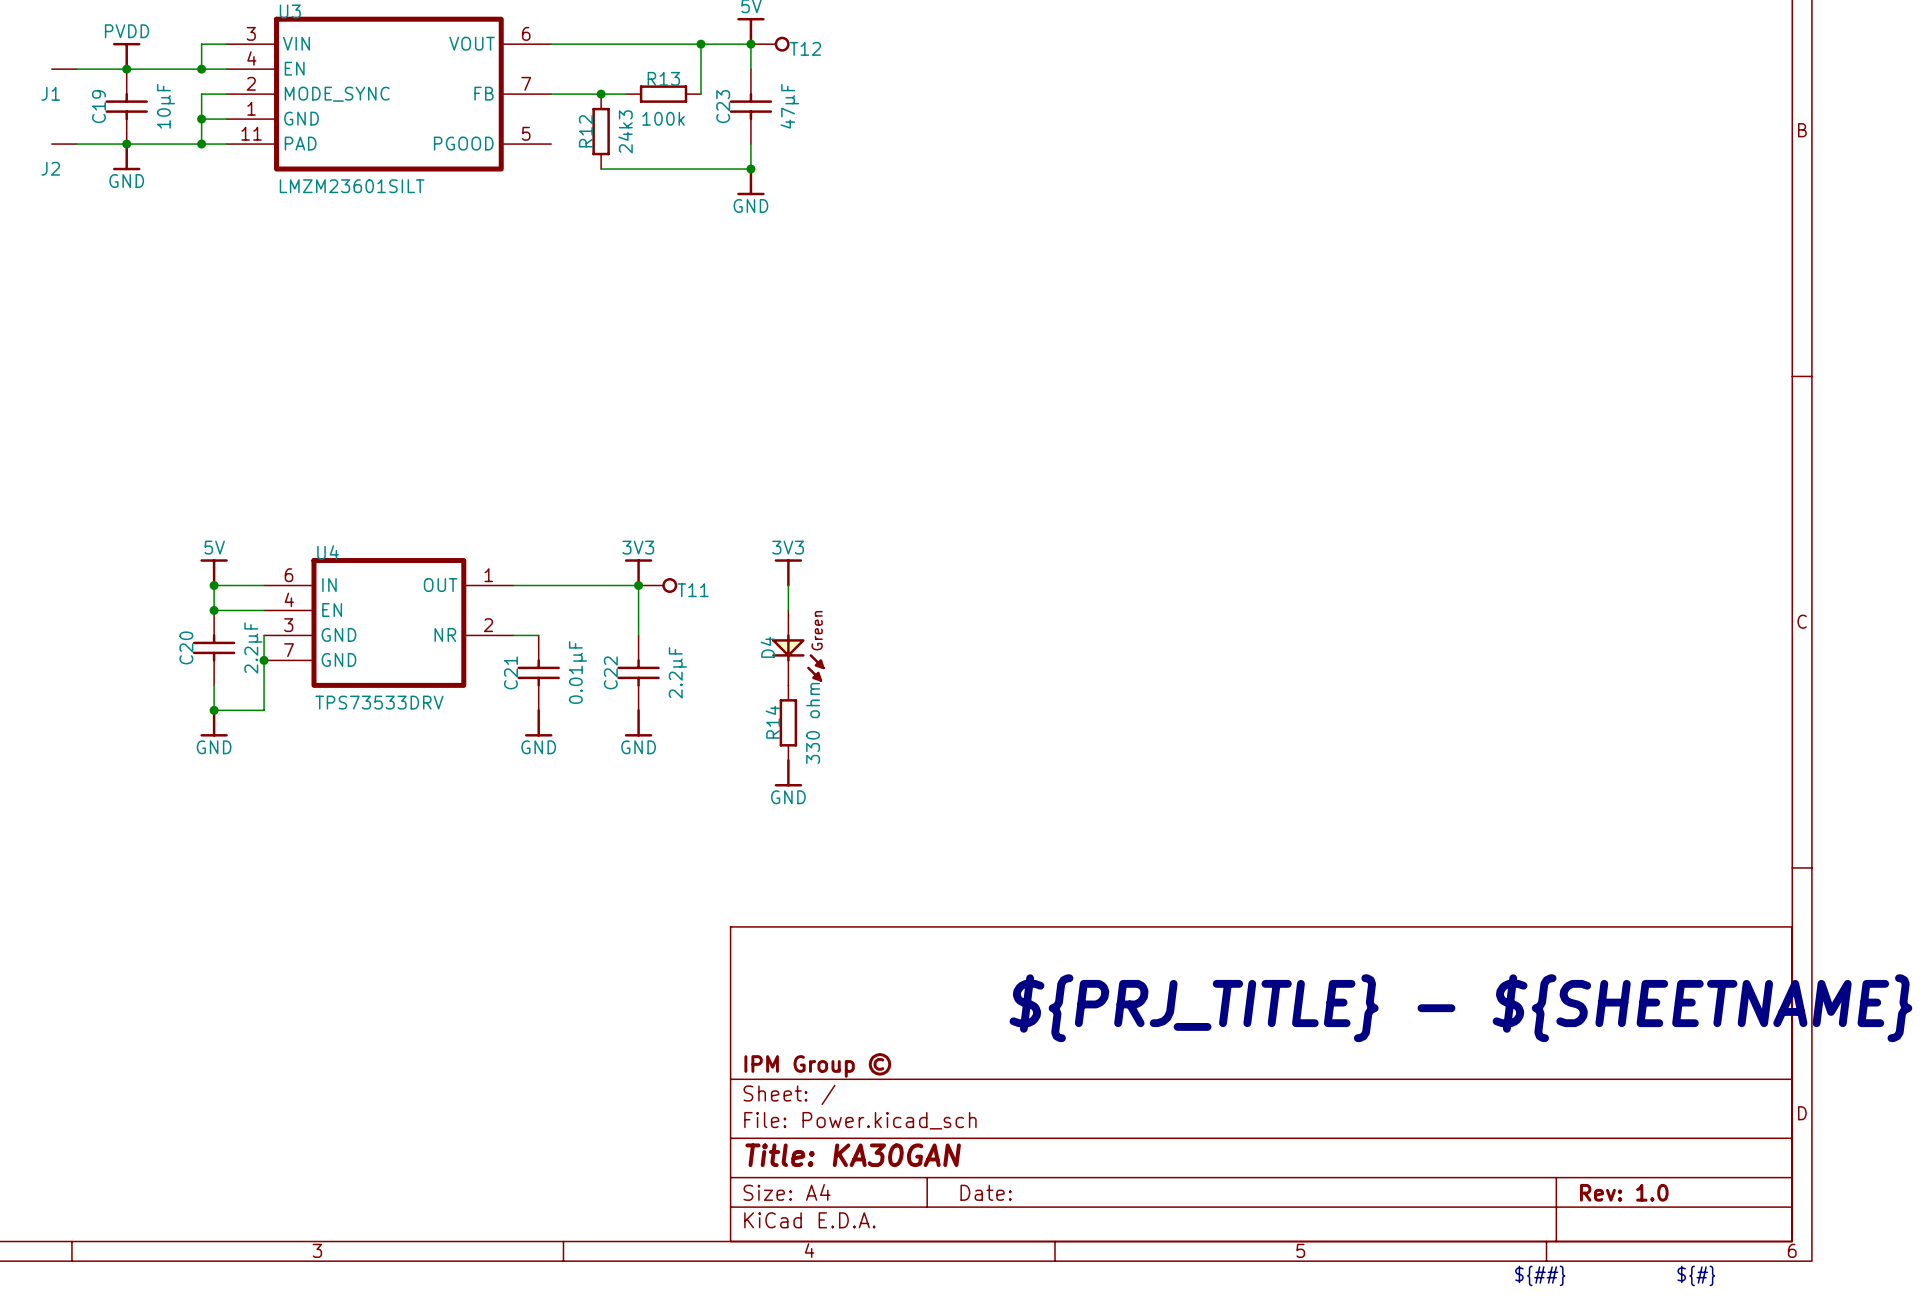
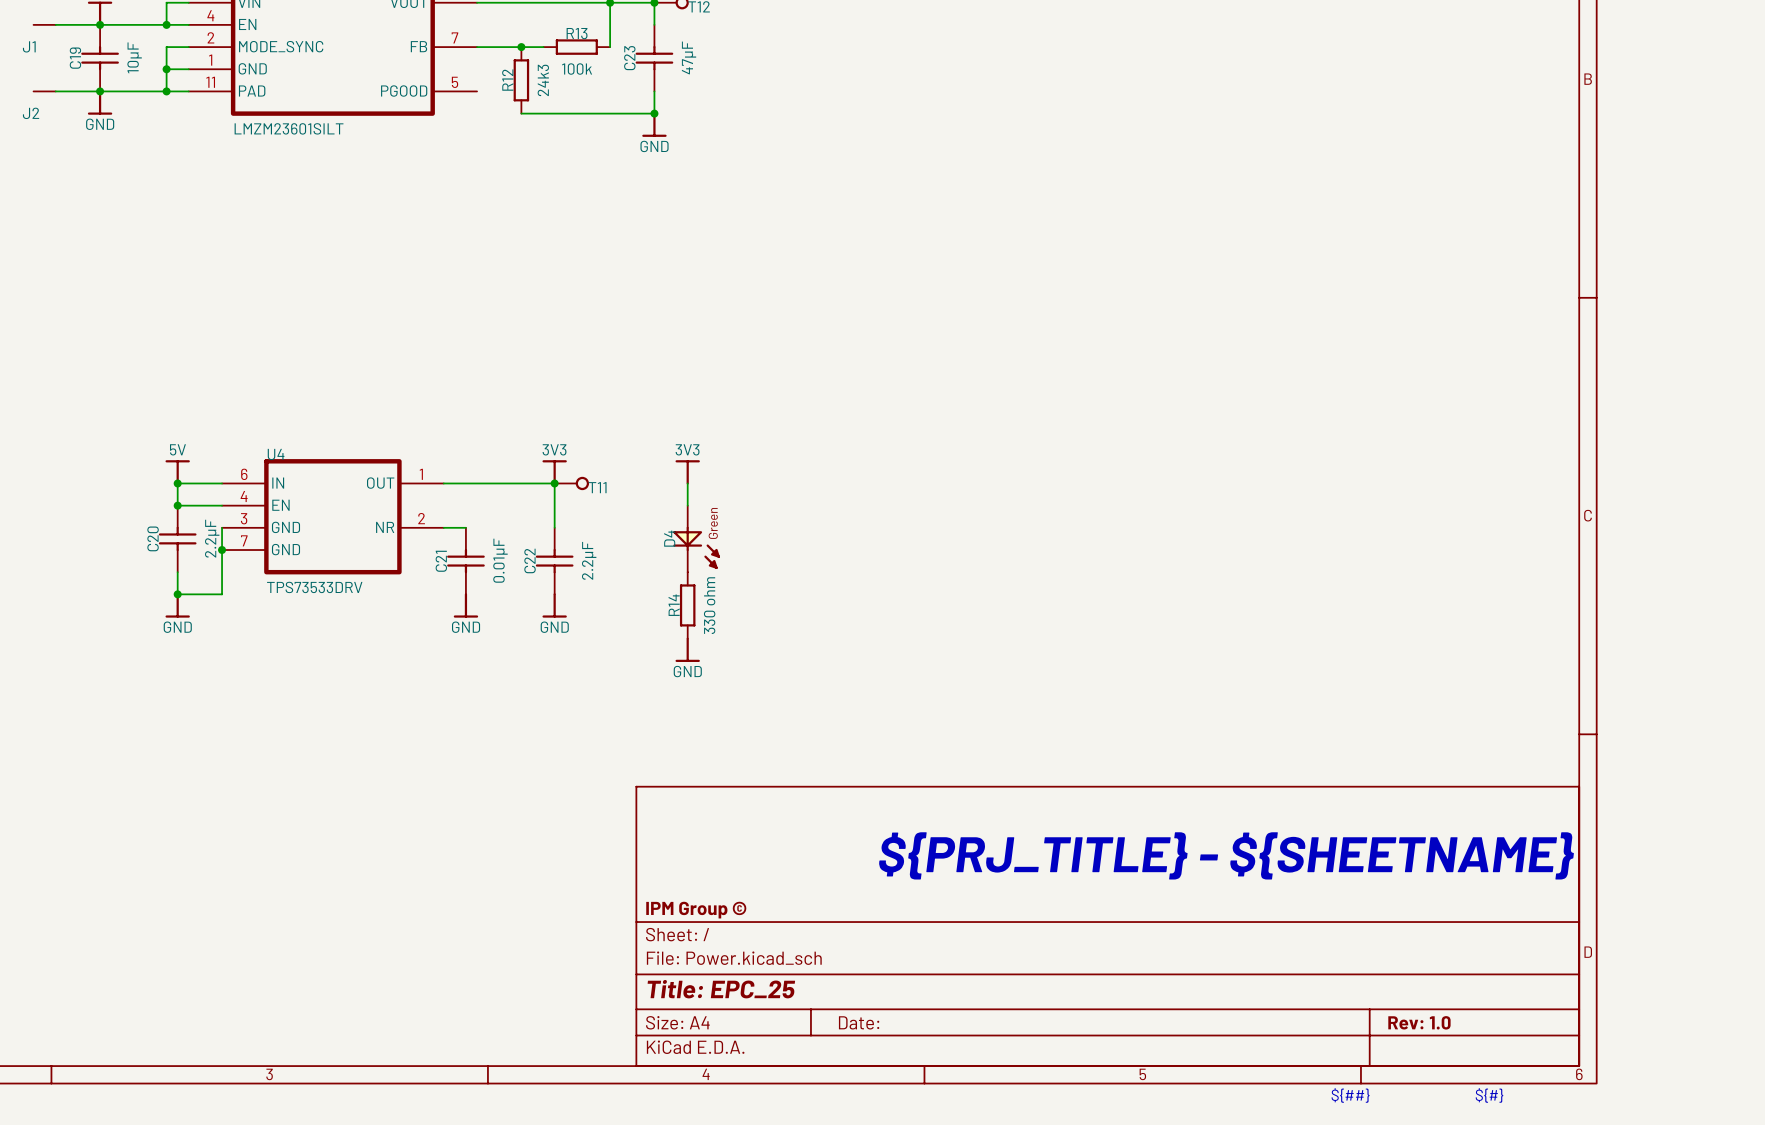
title block: Title: KA30GAN (853, 1155) -> Title: EPC_25 (721, 989)

